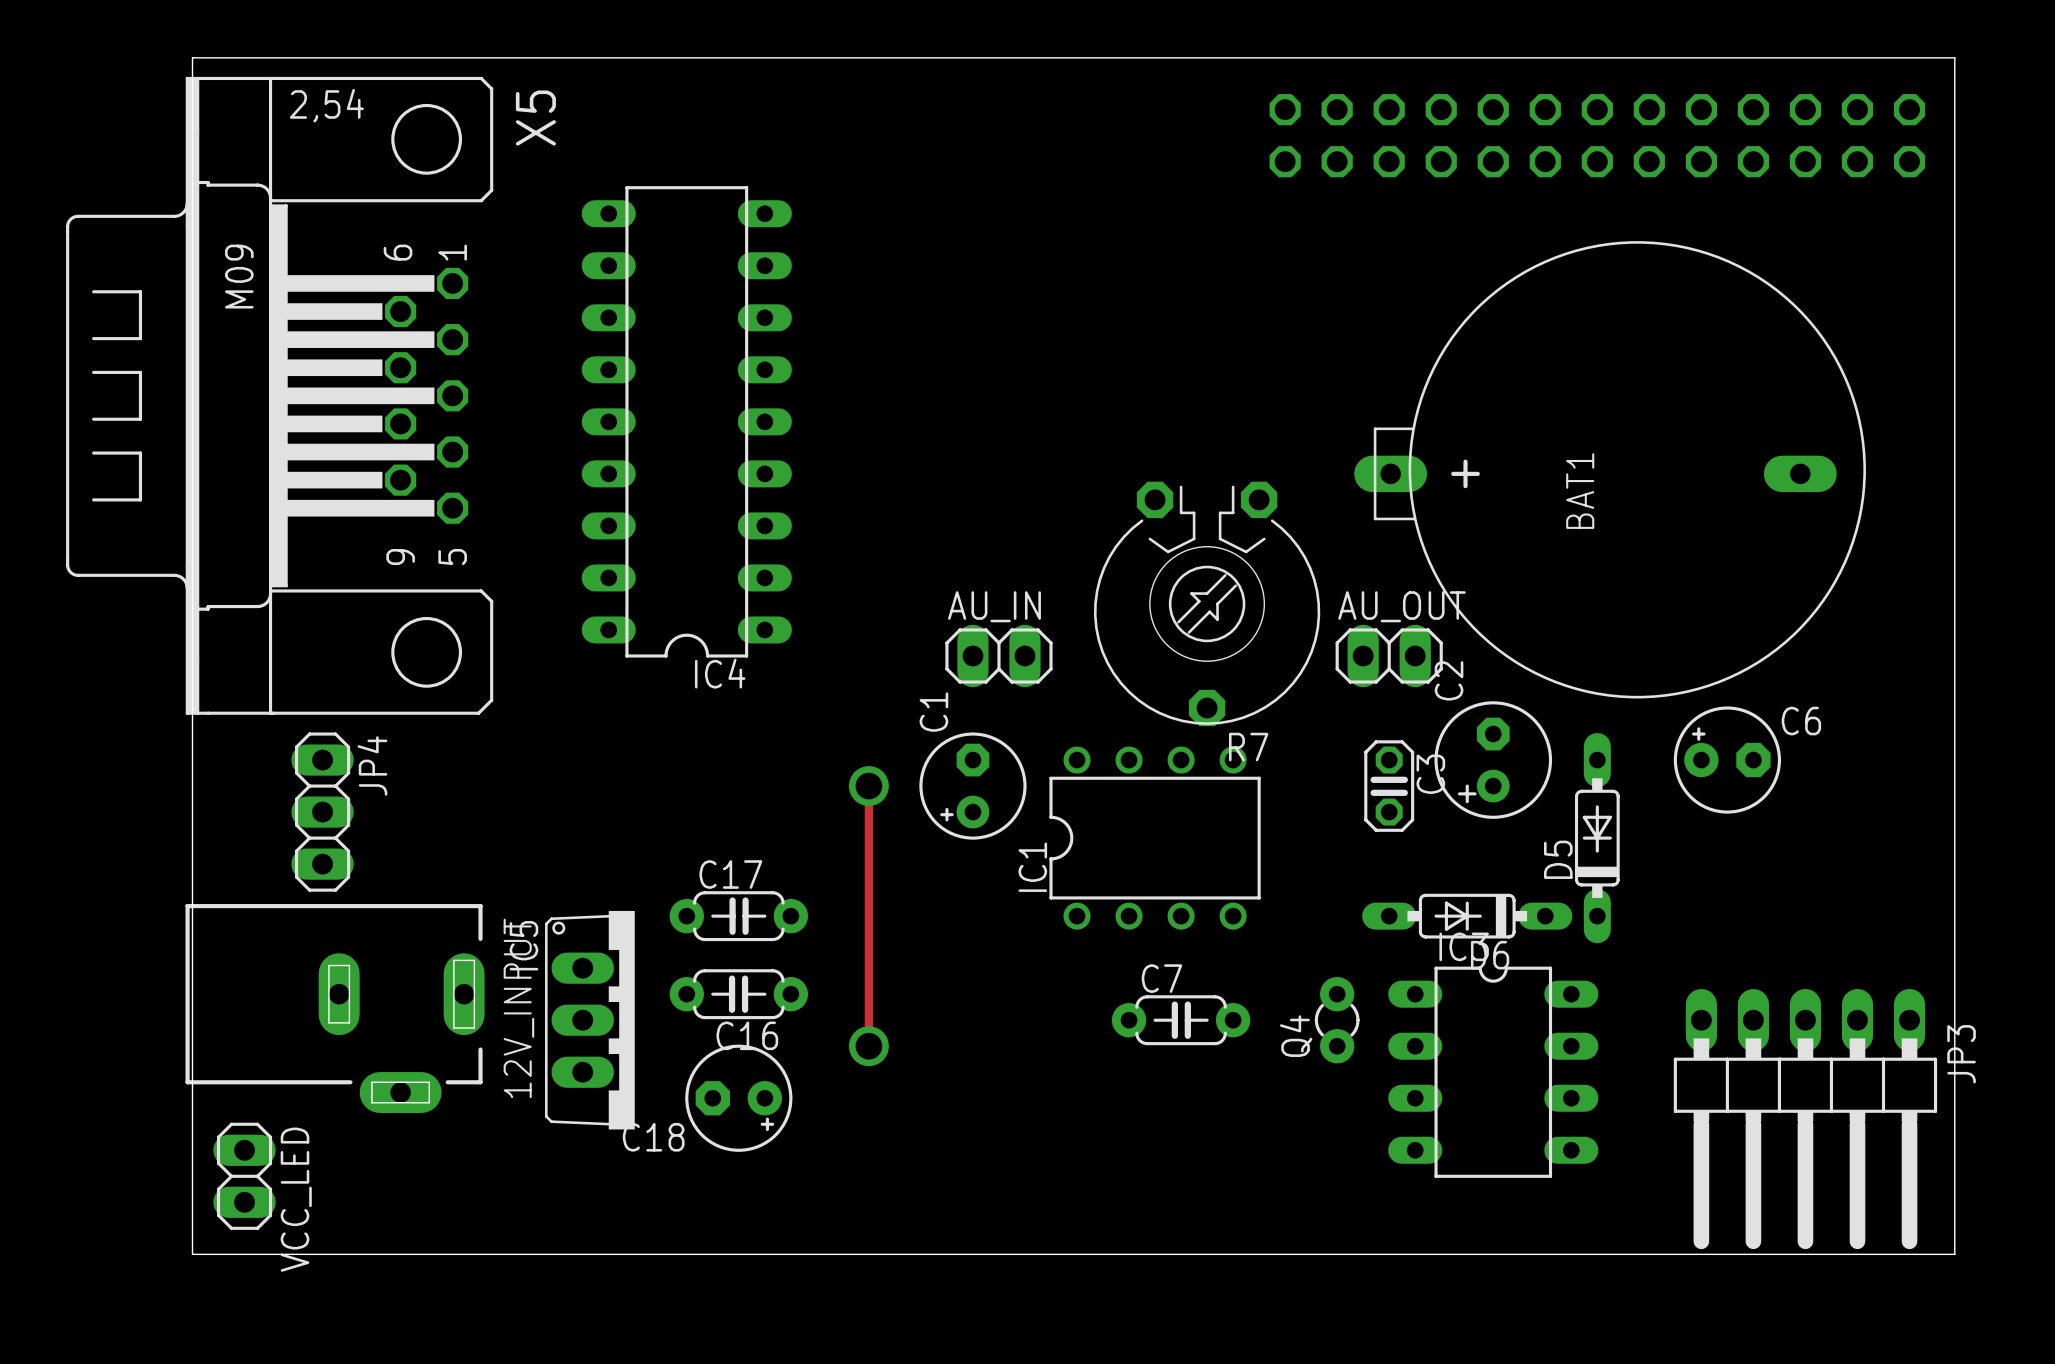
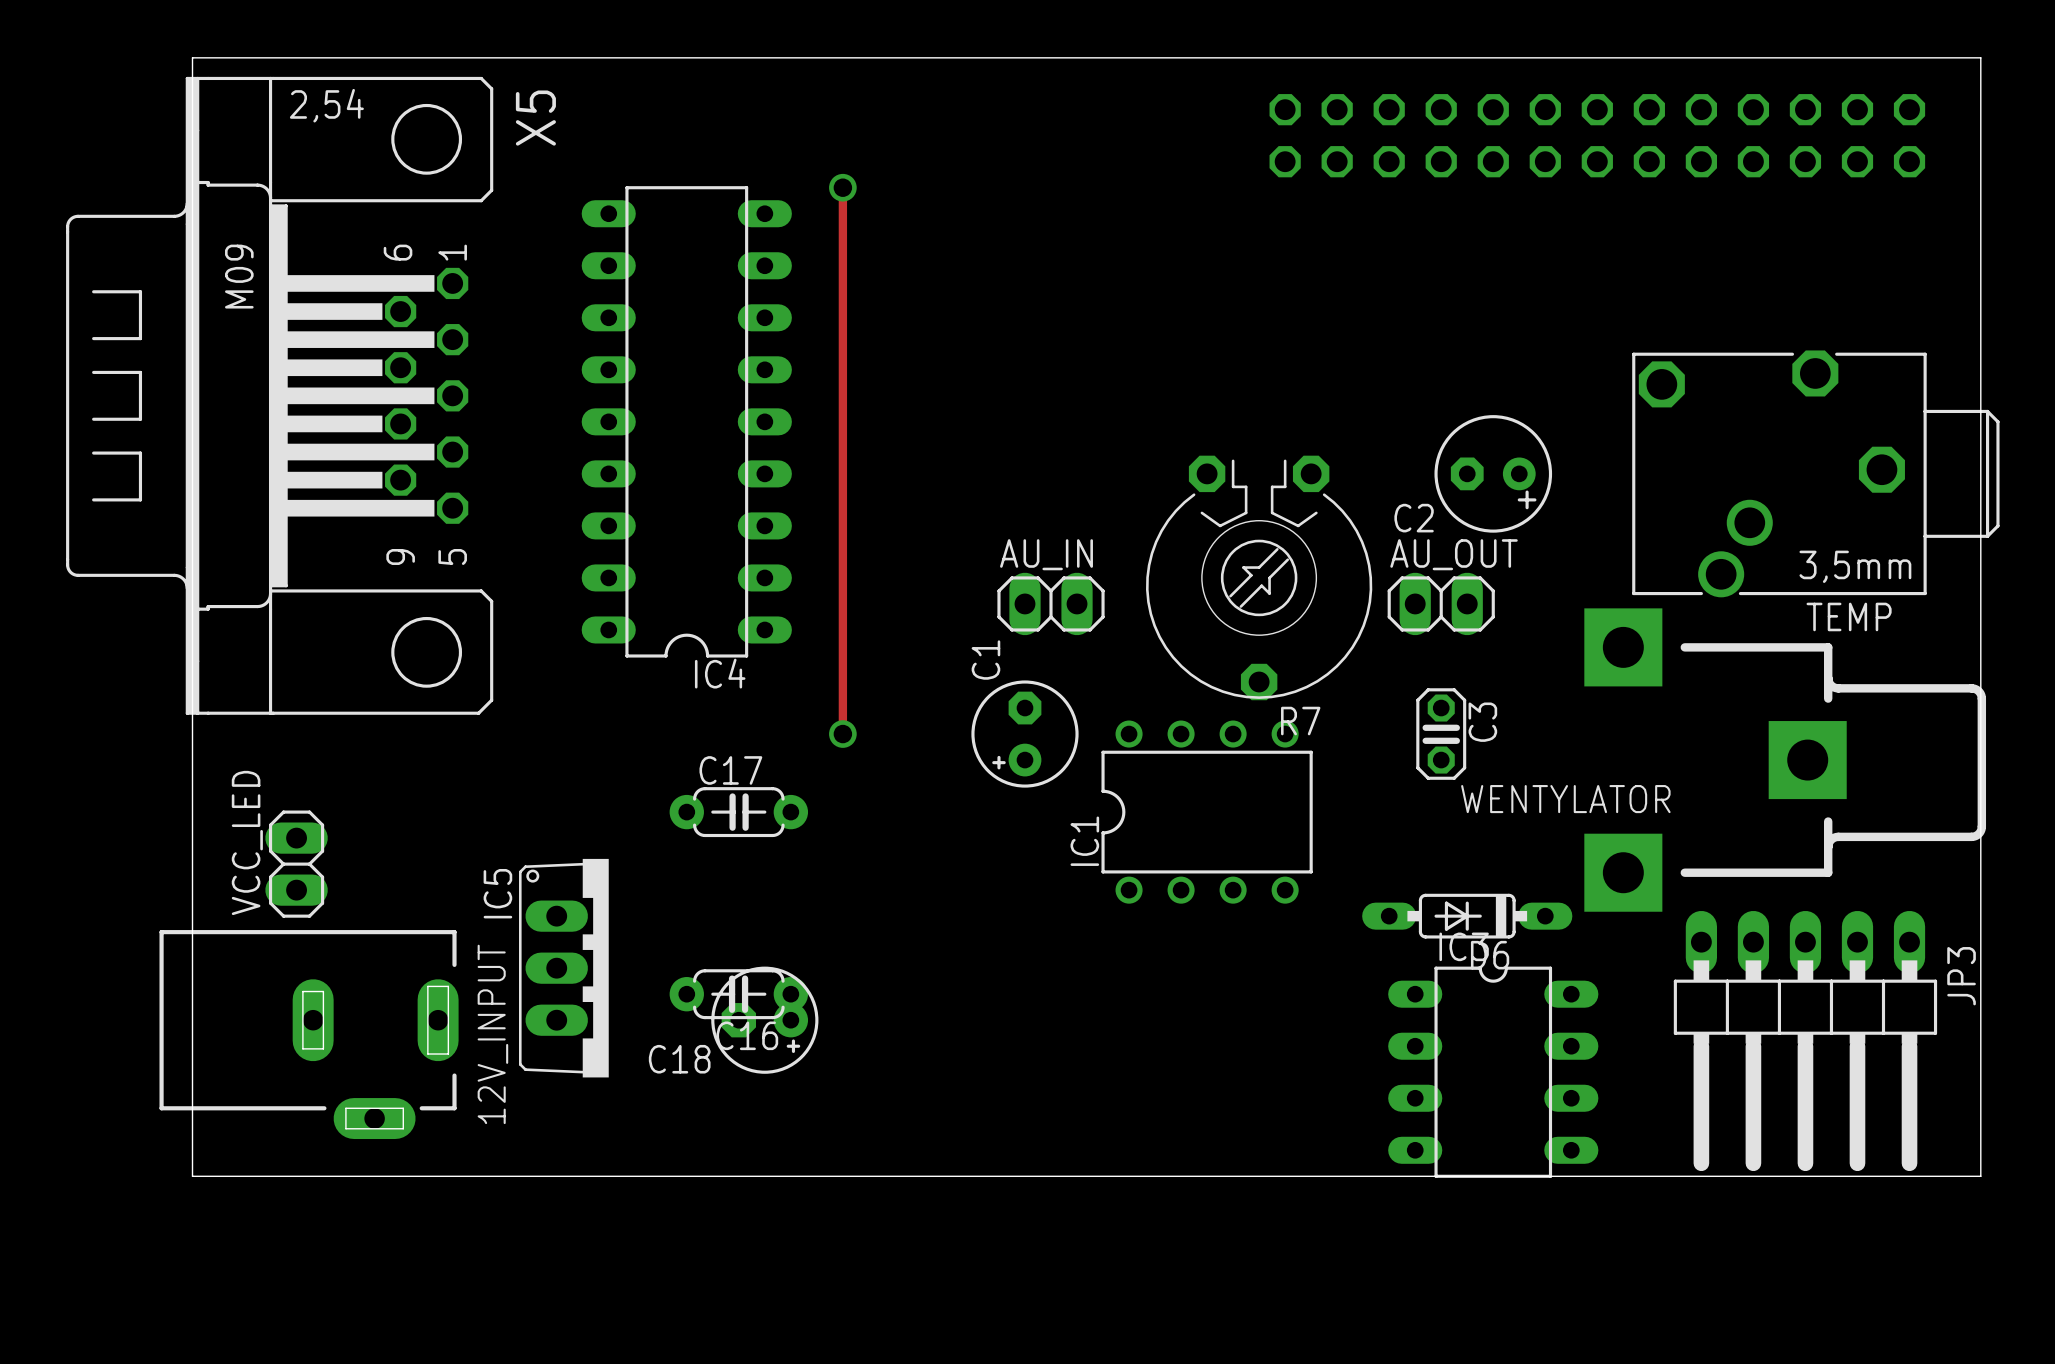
board edge: (1954, 57) (1954, 1254) (192, 1254) (192, 1176) -> (1954, 57) (1980, 57) (1980, 1176) (192, 1176)
track: none -> (842, 187) (842, 734)
via: none -> (842, 187)
BAT1: (1610, 469) -> none
TEMP: none -> (1815, 473)
R7 position: (1207, 603) -> (1259, 577)
AU_IN position: (998, 655) -> (1051, 603)
AU_OUT position: (1389, 655) -> (1441, 603)
via: none -> (842, 734)
C2 rotation: 0° (1493, 760) -> 90° counterclockwise (1493, 473)
C2 position: (1493, 760) -> (1493, 473)
C6: (1727, 760) -> none
WENTYLATOR: none -> (1785, 760)
track: (868, 786) (868, 1046) -> none
via: (868, 786) -> none
C1 position: (972, 786) -> (1024, 734)
C3 position: (1389, 786) -> (1441, 734)
JP4: (322, 812) -> none
IC1 position: (1155, 838) -> (1207, 812)
D5: (1597, 838) -> none
C17 position: (738, 916) -> (738, 812)
12V_INPUT position: (335, 1008) -> (309, 1034)
IC5 position: (589, 1020) -> (563, 968)
C7: (1181, 1020) -> none
Q4: (1337, 1020) -> none
via: (868, 1046) -> none
C18 position: (738, 1098) -> (764, 1020)
JP3 position: (1805, 1119) -> (1805, 1041)
VCC_LED position: (244, 1176) -> (296, 864)
VCC_LED name position: VCC_LED (296, 1199) -> VCC_LED (247, 842)

